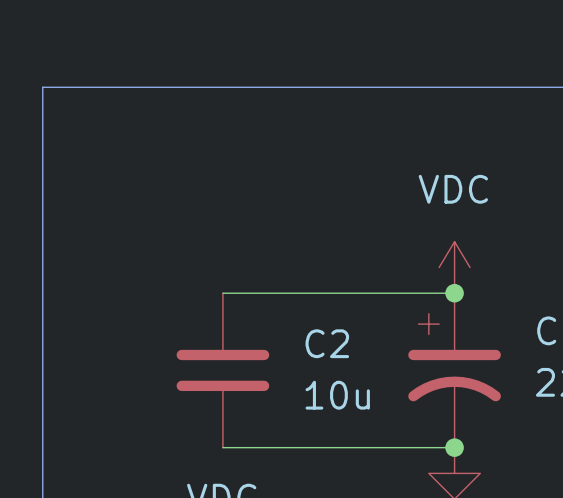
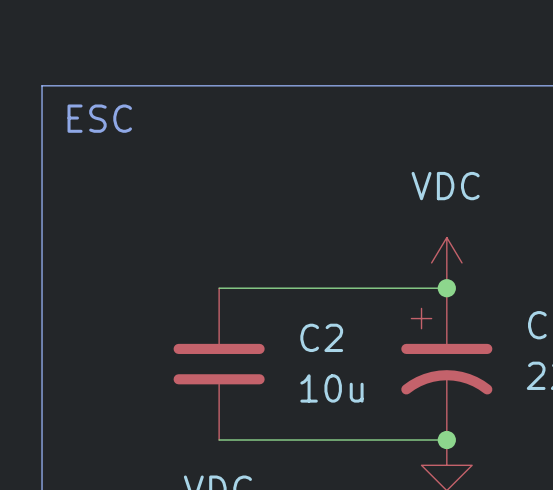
text: none -> ESC (99, 118)

